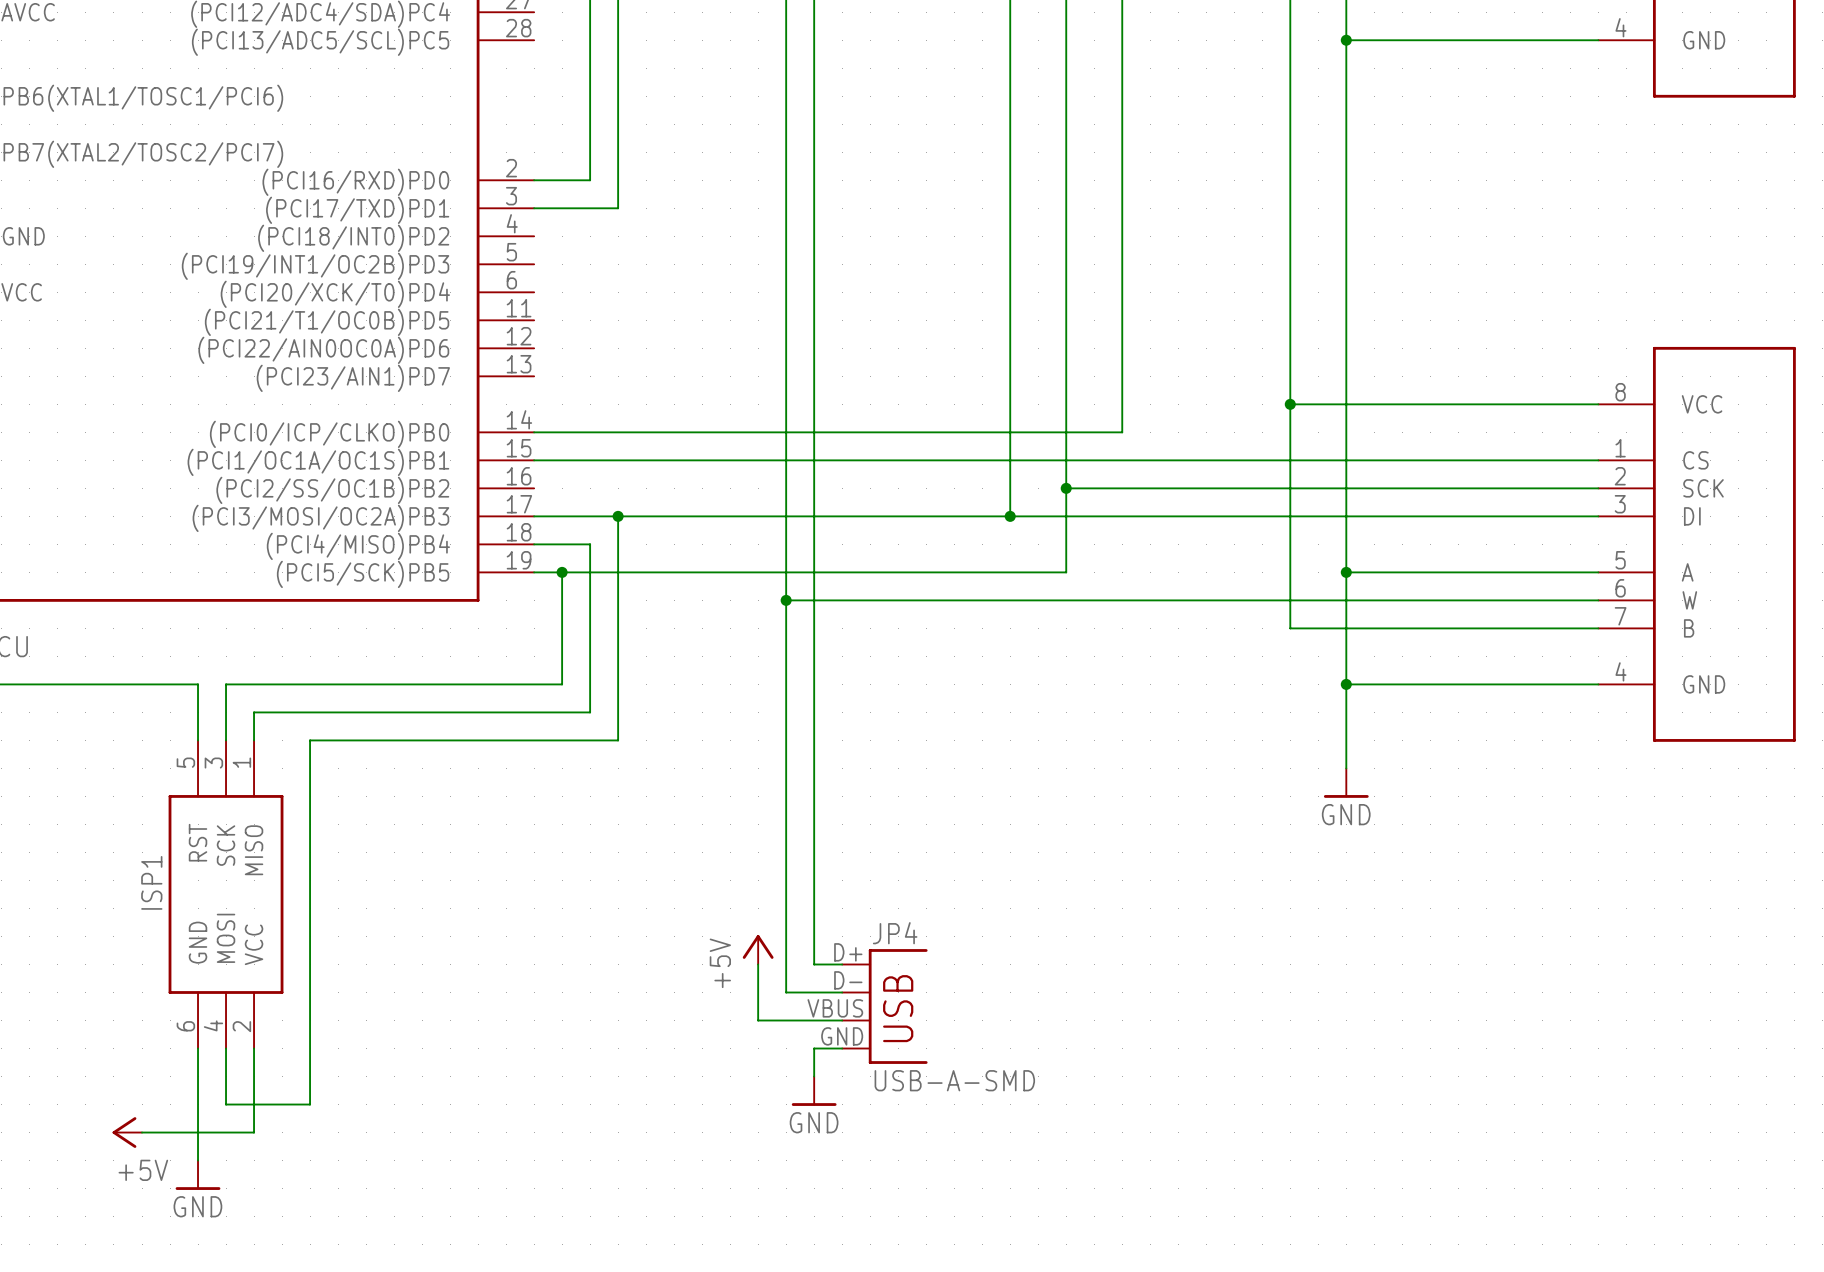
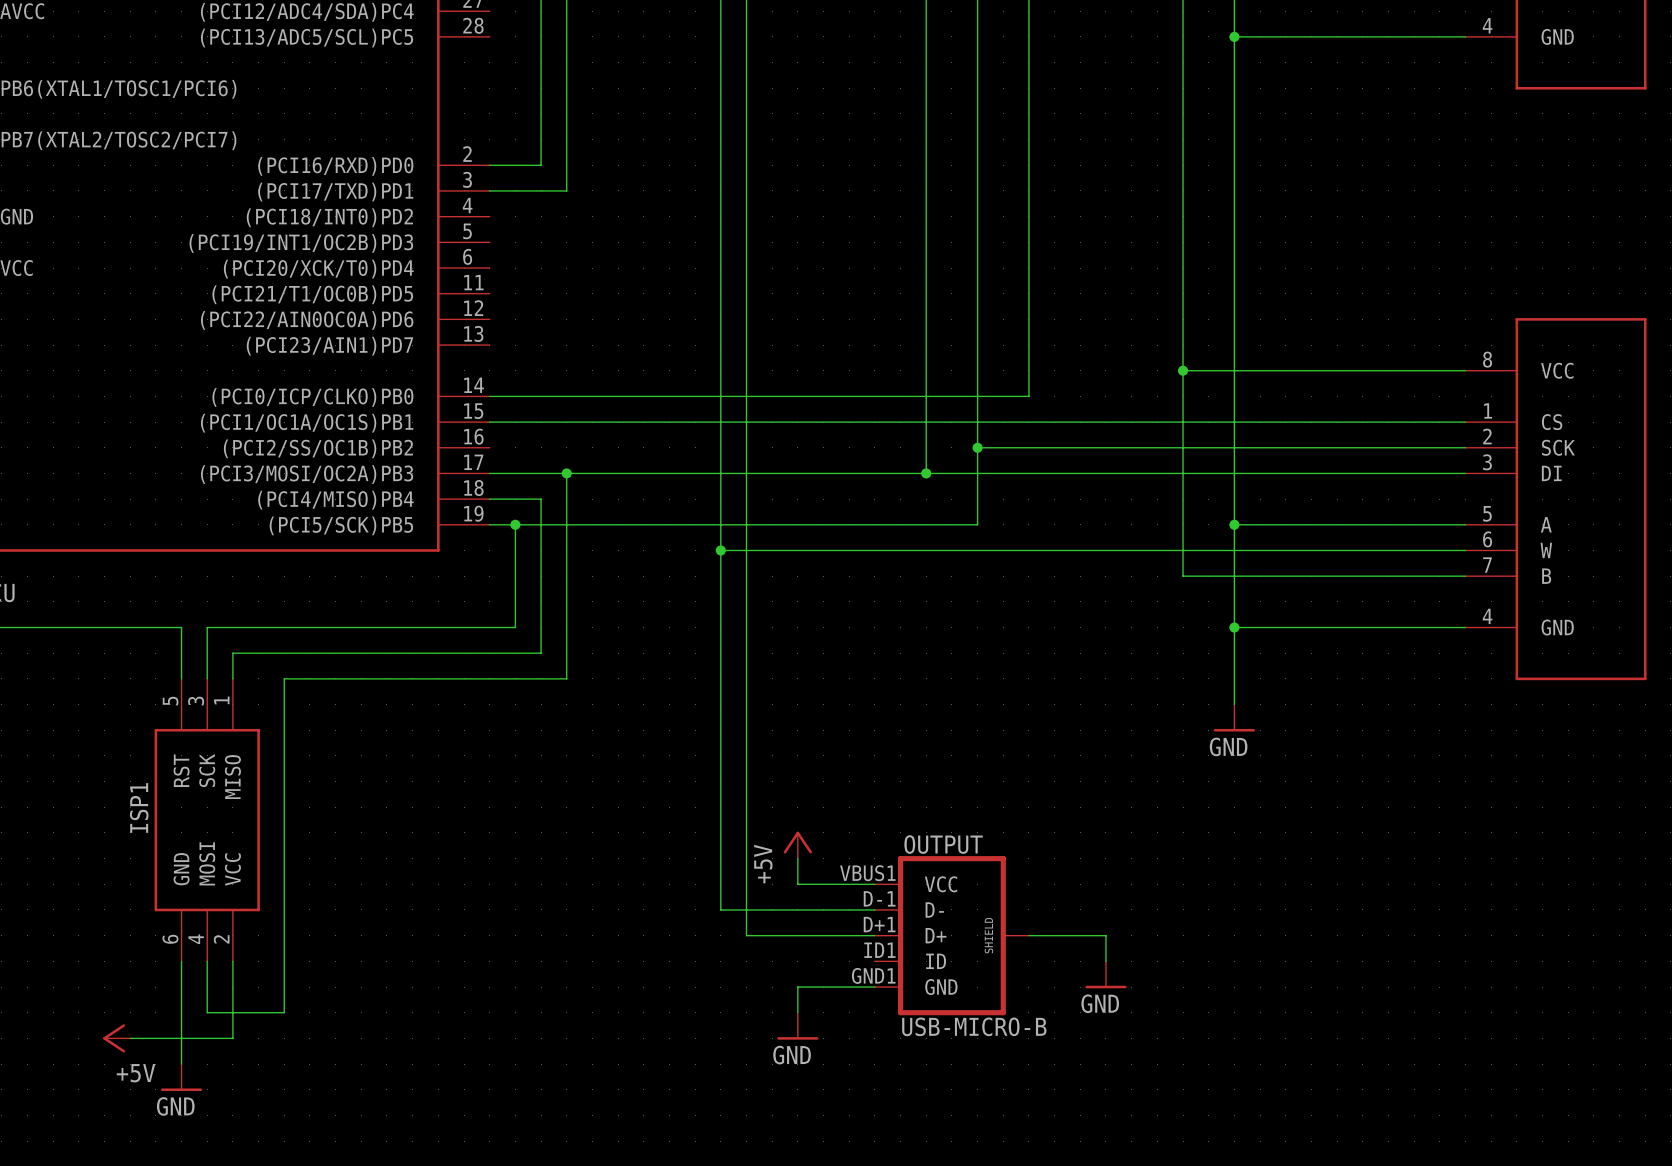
wire: none -> (797, 858) (797, 884) (874, 884)
power symbol position: +5V (758, 949) -> +5V (797, 845)
wire: (758, 964) (758, 1020) (814, 1020) -> (746, 884) (746, 935)
wire: (814, 964) (842, 964) -> none
wire: none -> (772, 909) (874, 909)
JP4: USB-A-SMD (884, 1006) -> none
wire: none -> (772, 935) (874, 935)
OUTPUT: none -> USB-MICRO-B (951, 935)
wire: none -> (1028, 935) (1105, 935) (1105, 961)
wire: (842, 1048) (814, 1048) (814, 1076) -> none
power symbol: none -> GND (1105, 974)
wire: none -> (874, 987) (797, 987) (797, 1012)
power symbol position: GND (814, 1091) -> GND (797, 1026)

